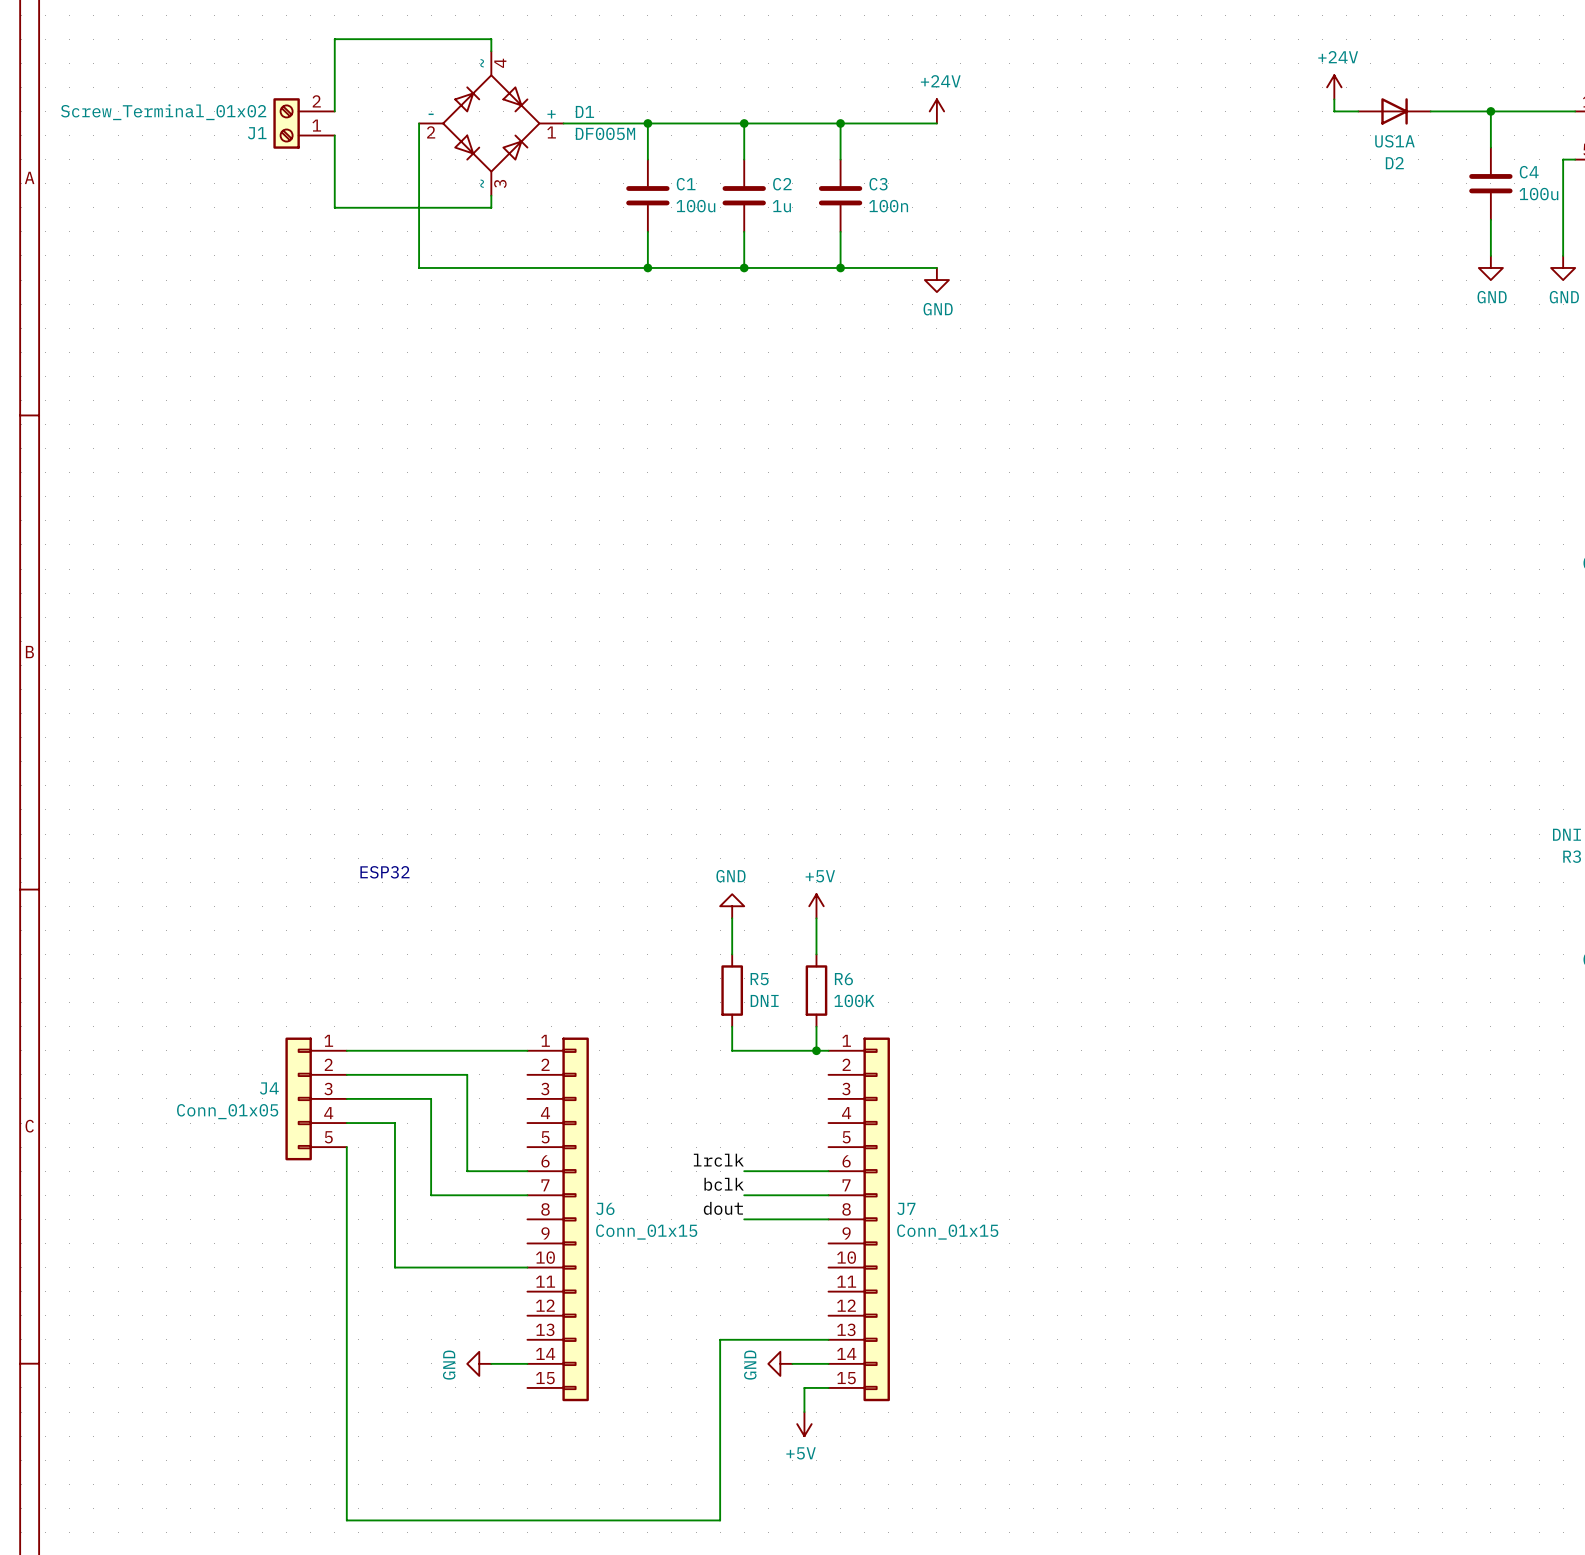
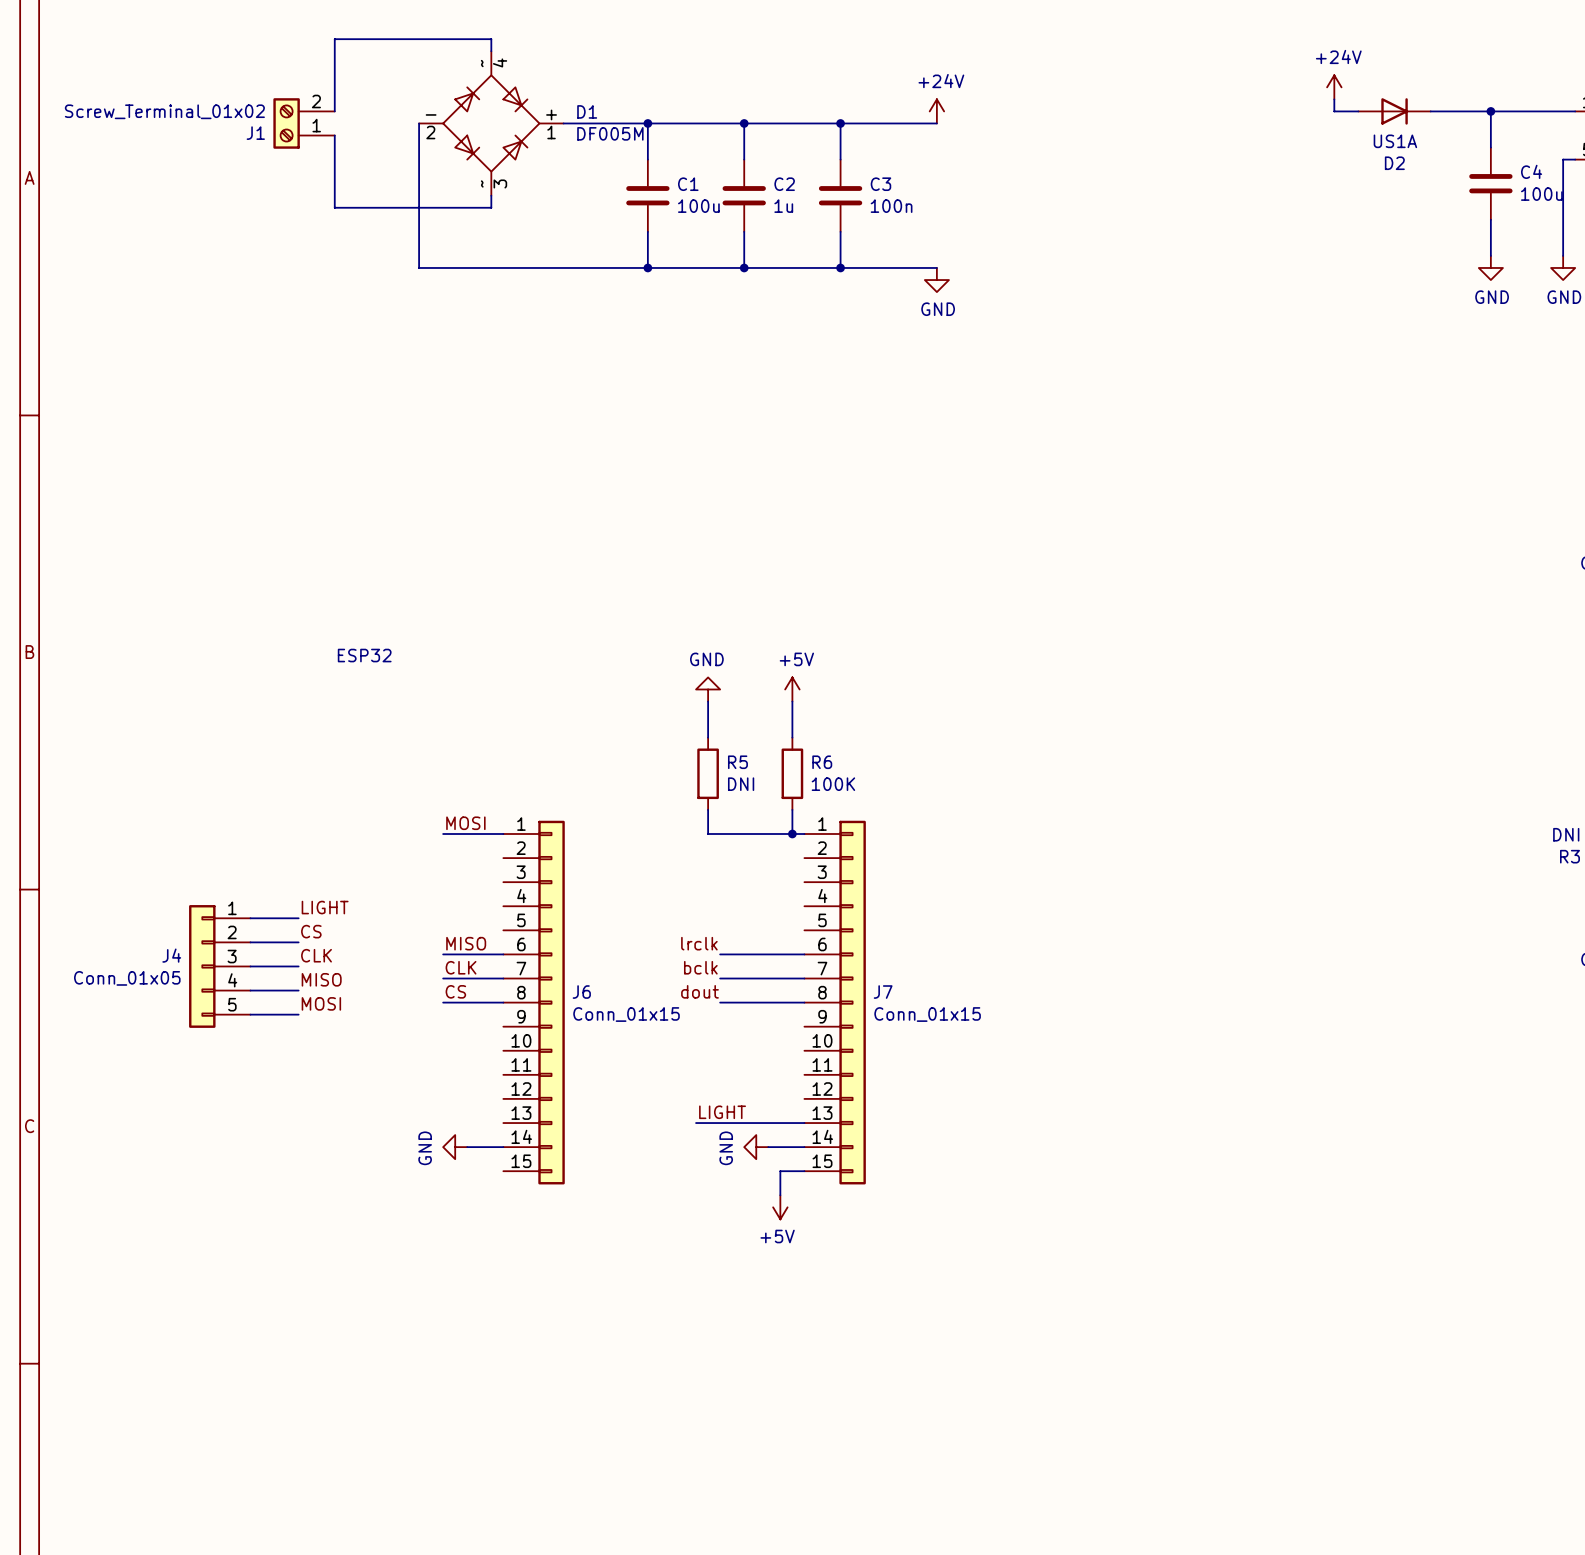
power symbol: none -> GND (708, 689)
power symbol: none -> +5V (792, 689)
label: none -> MOSI (465, 823)
wire: none -> (443, 834) (503, 834)
junction: none -> (792, 834)
text position: ESP32 (384, 872) -> ESP32 (364, 655)
power symbol: GND (732, 906) -> none
power symbol: +5V (816, 906) -> none
label: none -> LIGHT (325, 907)
wire: none -> (250, 918) (298, 918)
wire: (732, 918) (732, 954) -> (708, 701) (708, 737)
wire: (816, 918) (816, 954) -> (792, 701) (792, 737)
label: none -> CS (311, 931)
wire: none -> (250, 942) (298, 942)
label: none -> MISO (466, 943)
wire: none -> (443, 954) (503, 954)
wire: none -> (720, 954) (804, 954)
label: none -> CLK (316, 955)
wire: none -> (250, 966) (298, 966)
label: none -> CLK (461, 967)
wire: none -> (443, 978) (503, 978)
label: none -> MISO (321, 979)
wire: none -> (250, 990) (298, 990)
R5 position: (732, 990) -> (708, 773)
R6 position: (816, 990) -> (792, 773)
label: none -> CS (455, 991)
wire: none -> (443, 1002) (503, 1002)
label: none -> MOSI (321, 1003)
wire: none -> (250, 1014) (298, 1014)
wire: (732, 1026) (732, 1050) (828, 1050) -> (708, 809) (708, 834) (804, 834)
wire: (816, 1026) (816, 1050) -> (792, 809) (792, 834)
wire: (346, 1050) (527, 1050) -> none
junction: (816, 1050) -> none
wire: (346, 1074) (467, 1074) (467, 1171) (527, 1171) -> none
J4 position: (316, 1098) -> (219, 966)
wire: (346, 1098) (431, 1098) (431, 1195) (527, 1195) -> none
label: none -> LIGHT (722, 1112)
wire: (346, 1123) (394, 1123) (394, 1267) (527, 1267) -> none
wire: none -> (696, 1123) (804, 1123)
wire: (346, 1147) (346, 1520) (720, 1520) (720, 1339) (828, 1339) -> none
power symbol: none -> GND (455, 1147)
power symbol: none -> GND (756, 1147)
label position: lrclk (718, 1160) -> lrclk (699, 943)
wire: (744, 1171) (780, 1171) -> (780, 1195) (780, 1171)
label position: bclk (724, 1184) -> bclk (700, 967)
wire: (744, 1195) (828, 1195) -> (720, 978) (804, 978)
power symbol: none -> +5V (780, 1207)
label position: dout (723, 1208) -> dout (699, 991)
J6 position: (558, 1219) -> (534, 1002)
wire: (744, 1219) (828, 1219) -> (720, 1002) (804, 1002)
J7 position: (859, 1219) -> (835, 1002)
power symbol: GND (479, 1363) -> none
wire: (491, 1363) (527, 1363) -> (467, 1147) (503, 1147)
power symbol: GND (780, 1363) -> none
wire: (792, 1363) (828, 1363) -> (768, 1147) (804, 1147)
wire: (828, 1387) (804, 1387) (804, 1412) -> none
power symbol: +5V (804, 1424) -> none

